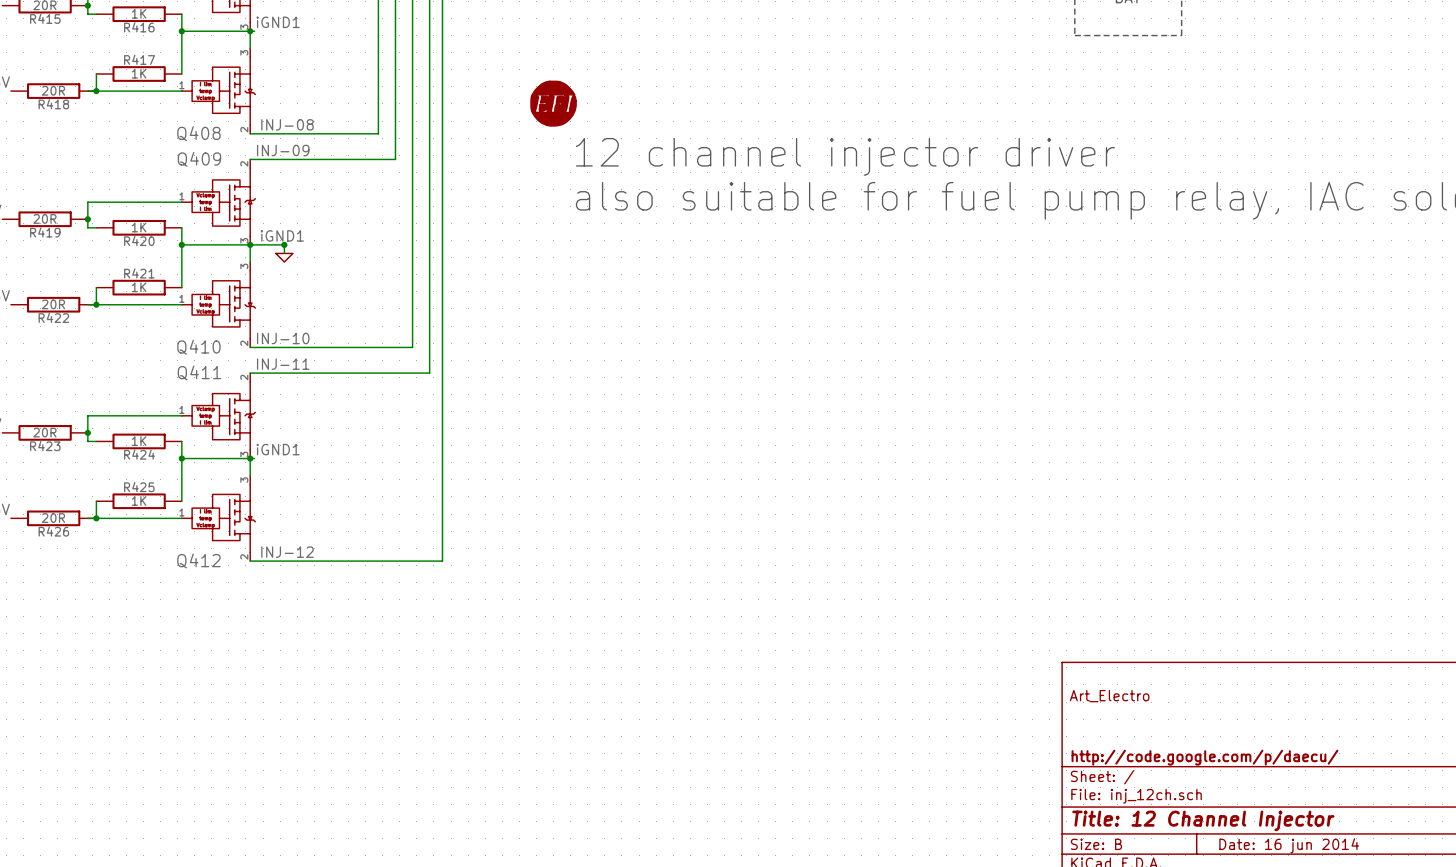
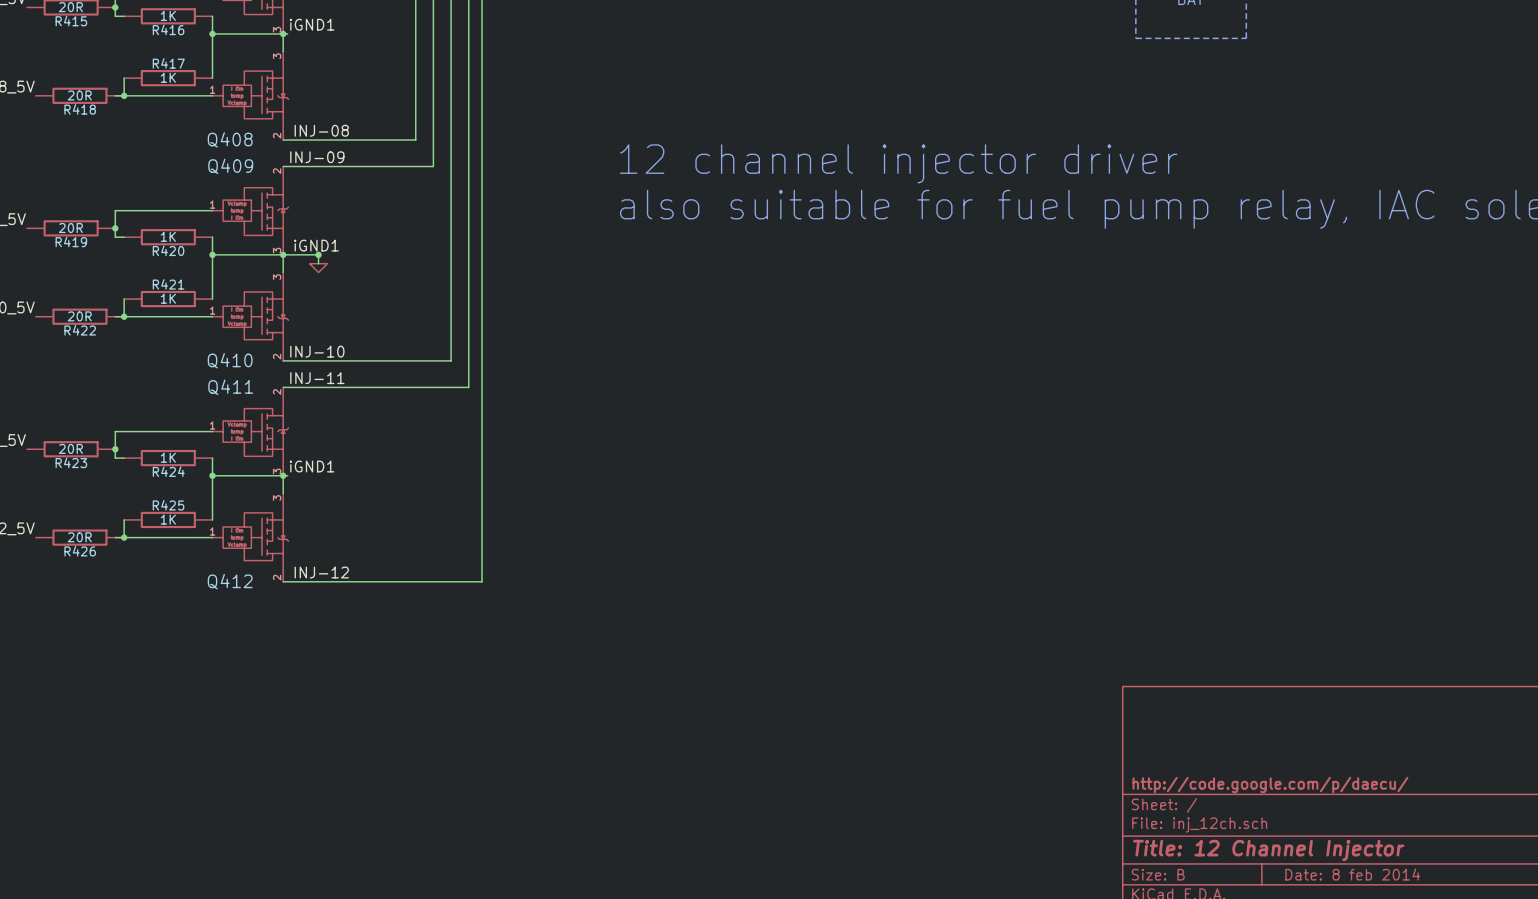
power symbol: (553, 103) -> none
title block: Art_Electro (1109, 696) -> none
title block: Date: 16 jun 2014 (1289, 845) -> Date: 8 feb 2014 (1352, 874)

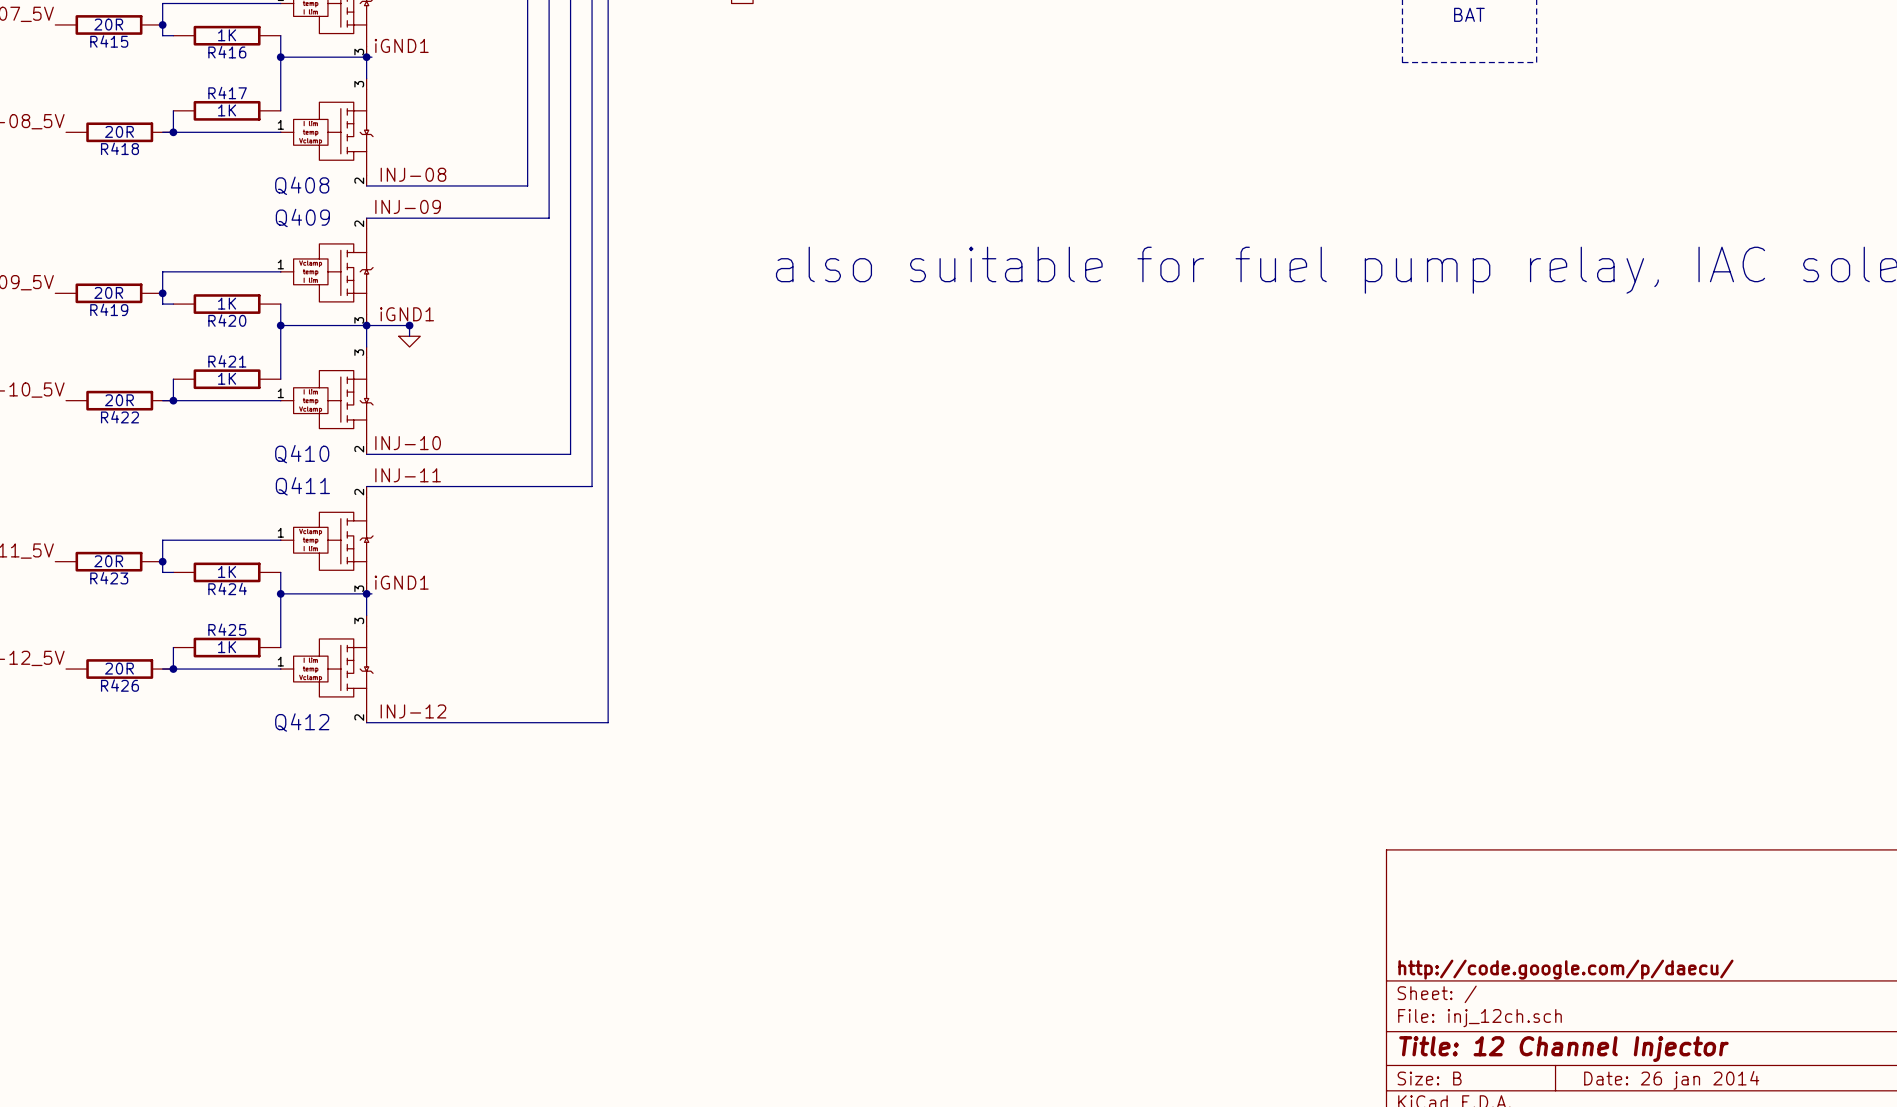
text: 12 channel injector driver (898, 163) -> none
title block: Date: 8 feb 2014 (1352, 874) -> Date: 26 jan 2014 (1671, 1080)

